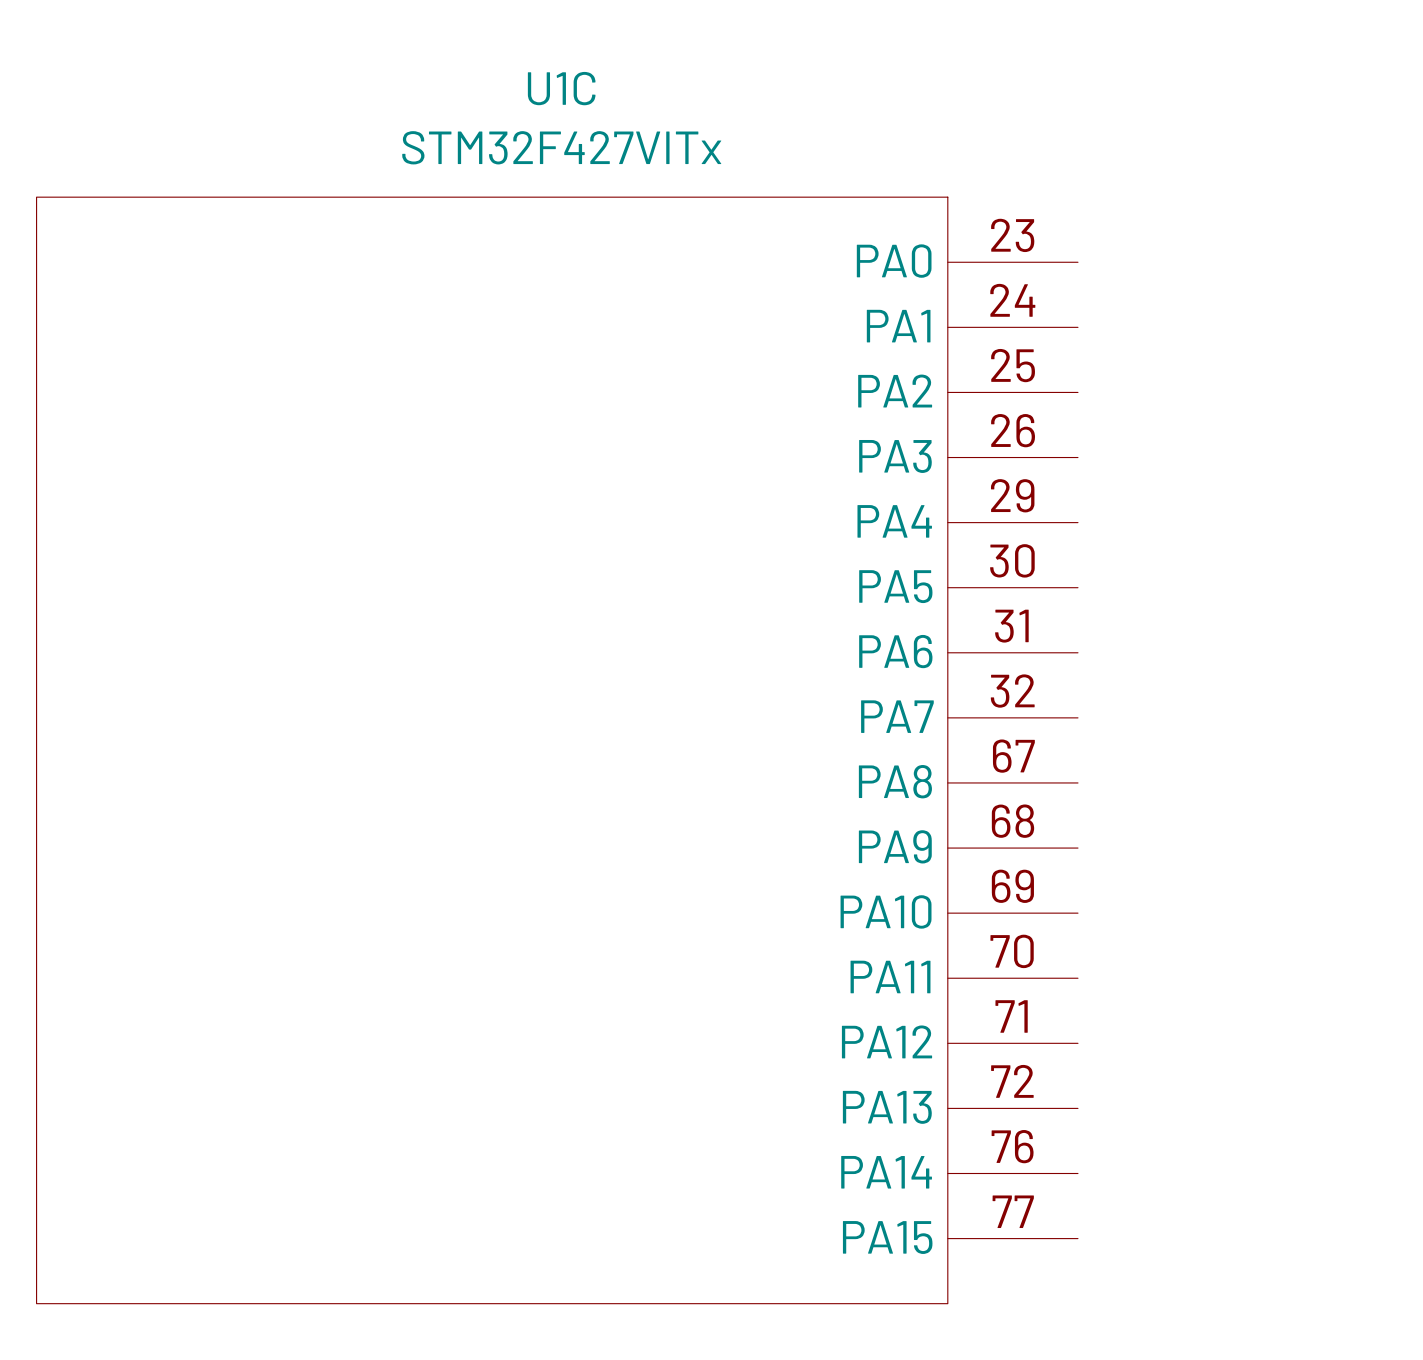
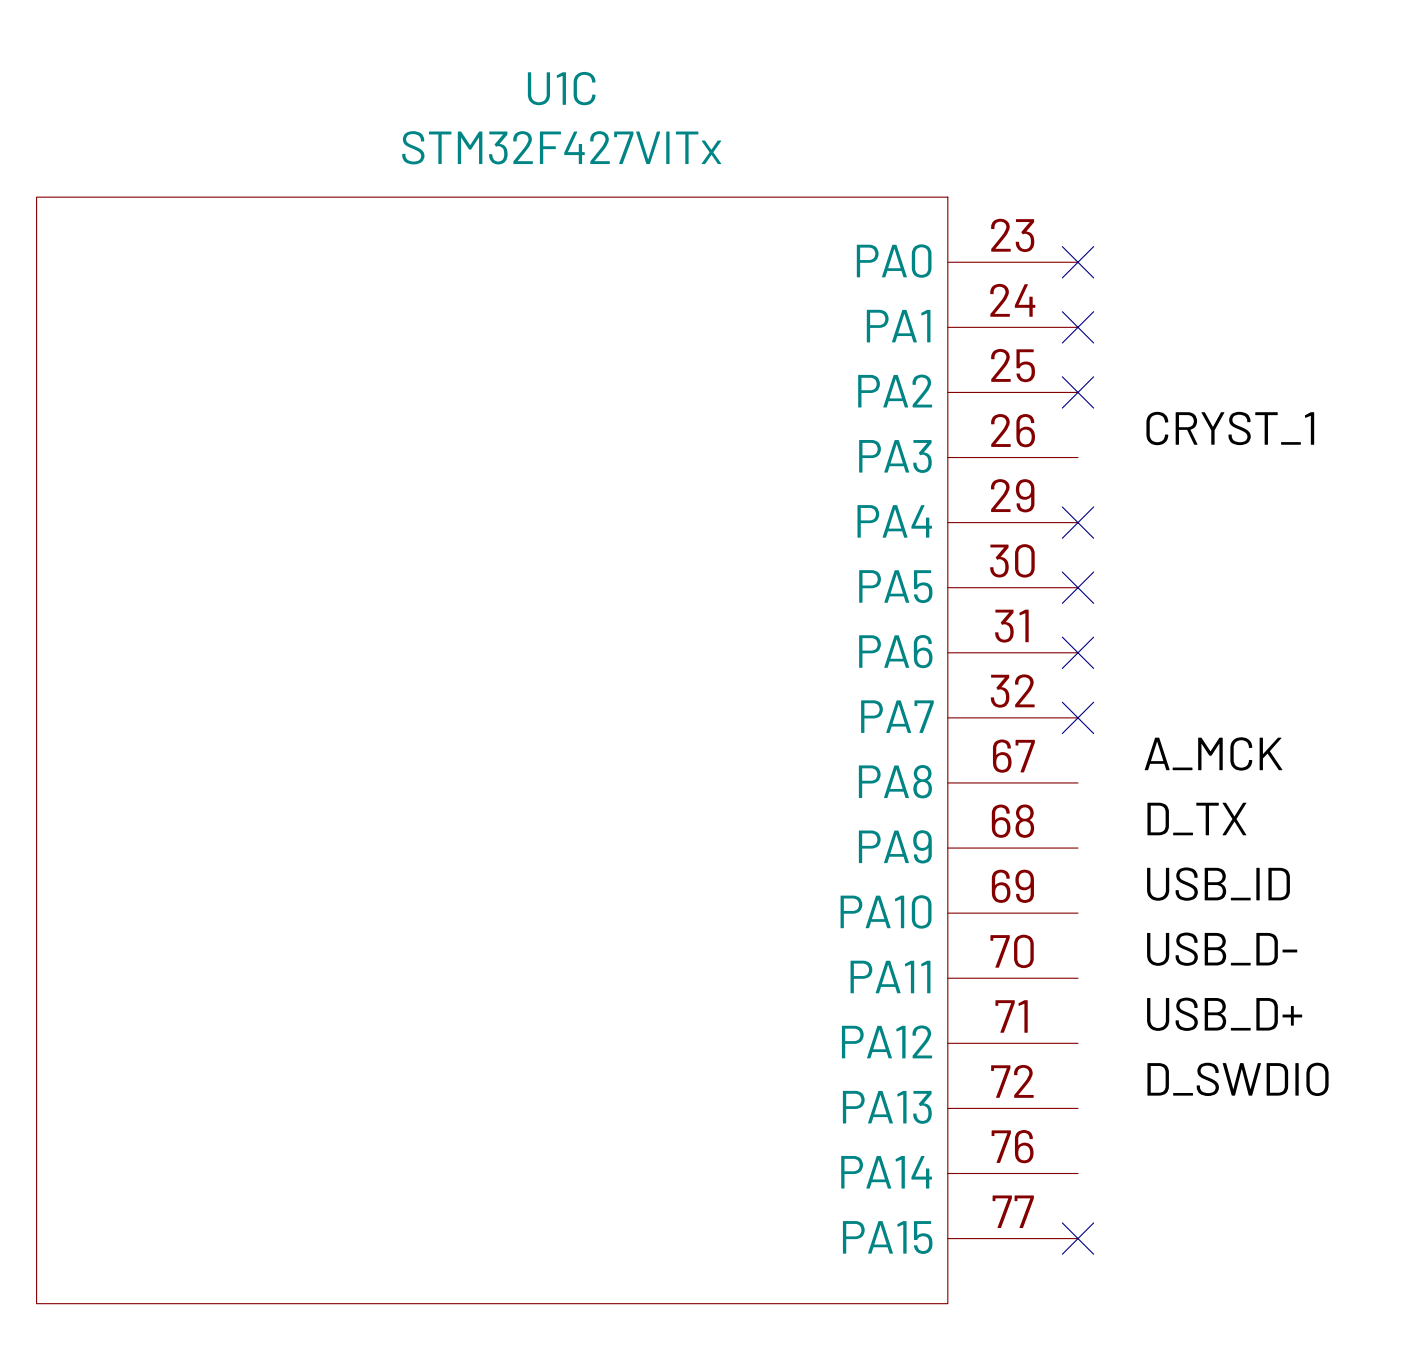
no-connect mark: none -> (1077, 262)
no-connect mark: none -> (1077, 327)
no-connect mark: none -> (1077, 392)
label: none -> CRYST_1 (1230, 428)
no-connect mark: none -> (1077, 522)
no-connect mark: none -> (1077, 587)
no-connect mark: none -> (1077, 652)
no-connect mark: none -> (1077, 717)
label: none -> A_MCK (1213, 753)
label: none -> D_TX (1196, 819)
label: none -> USB_ID (1218, 884)
label: none -> USB_D- (1222, 949)
label: none -> USB_D+ (1224, 1014)
label: none -> D_SWDIO (1238, 1079)
no-connect mark: none -> (1077, 1238)

